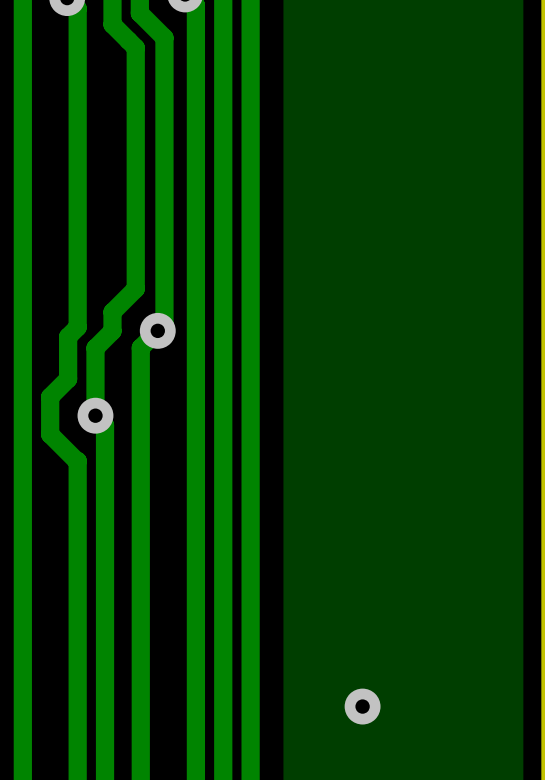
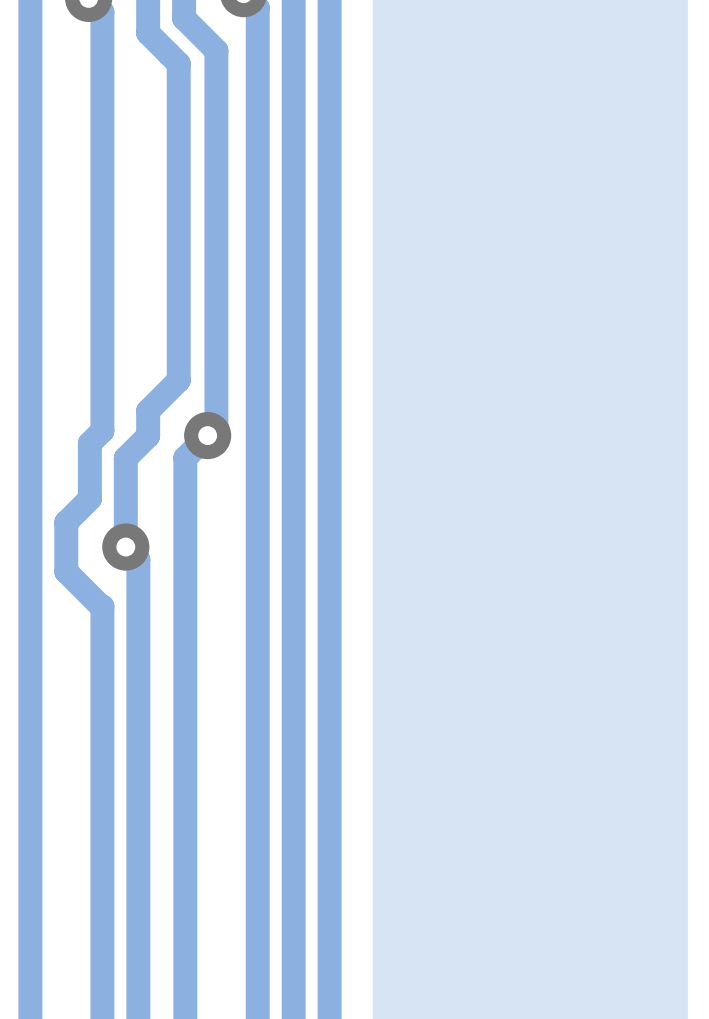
via: (362, 706) -> none

